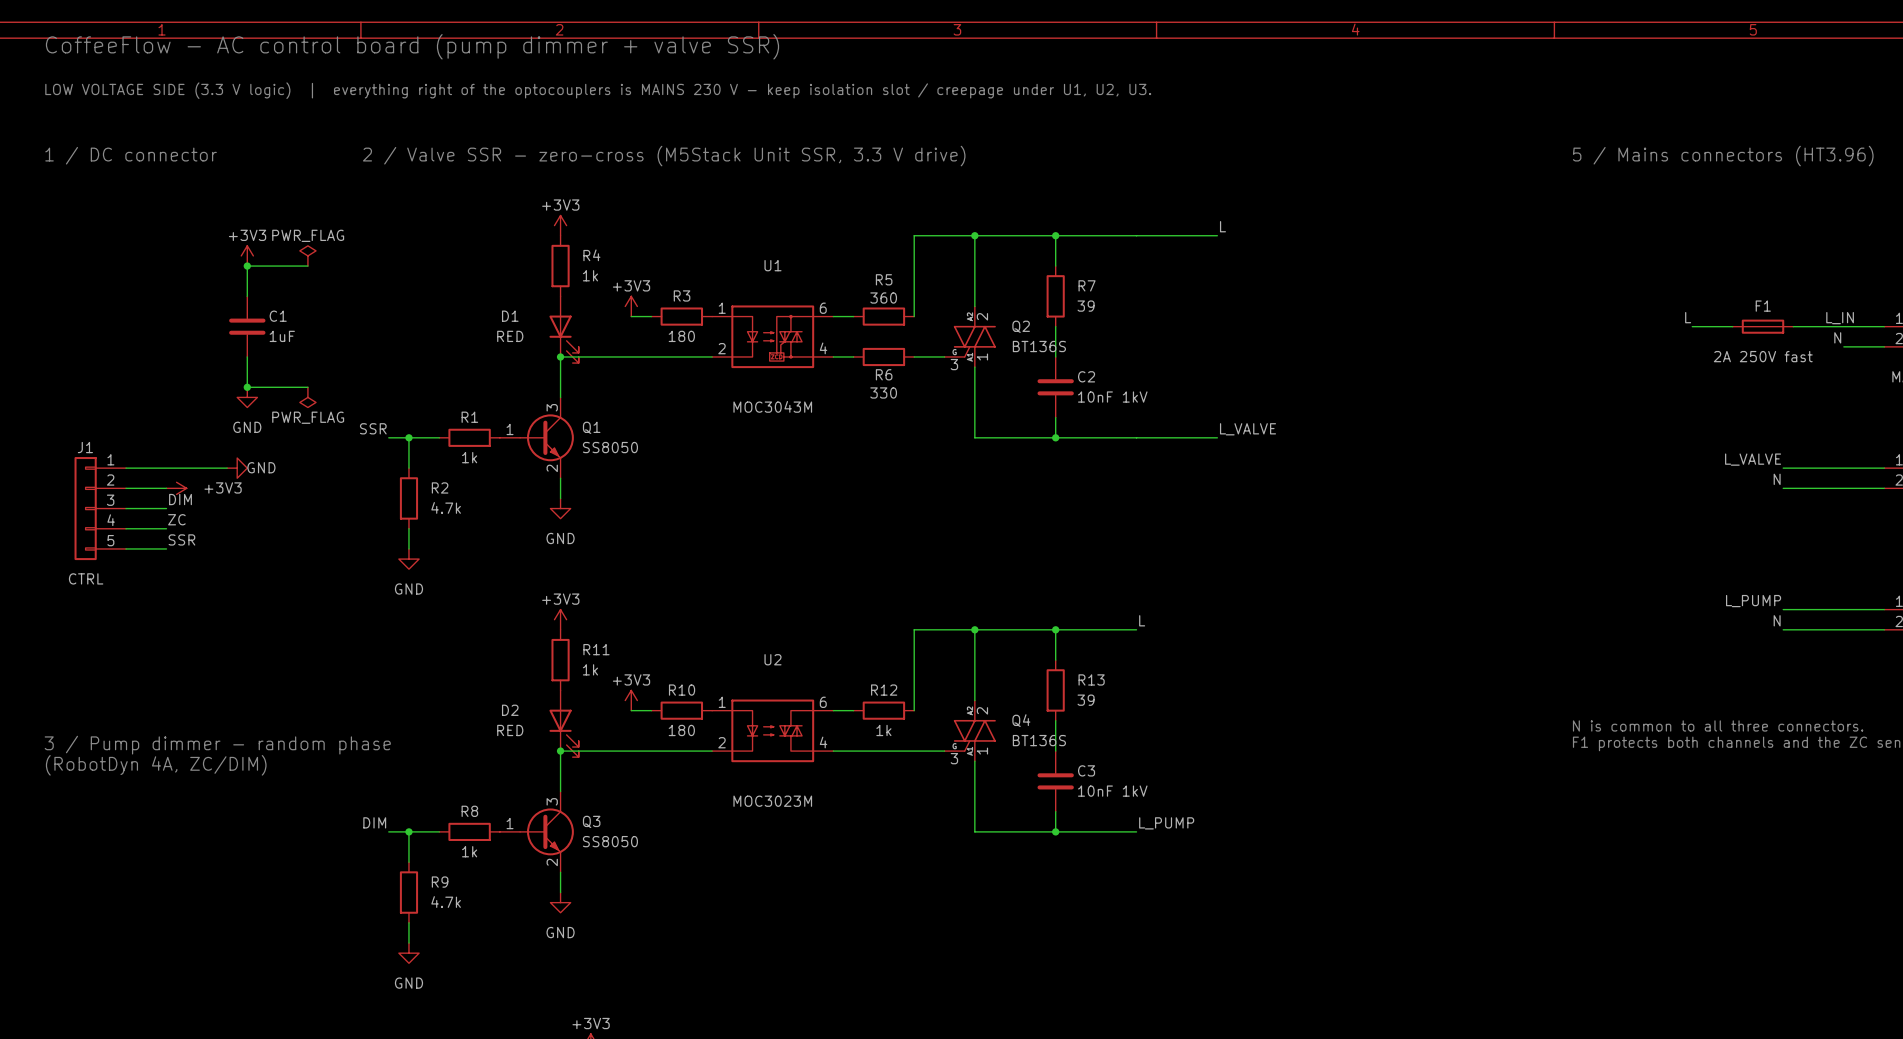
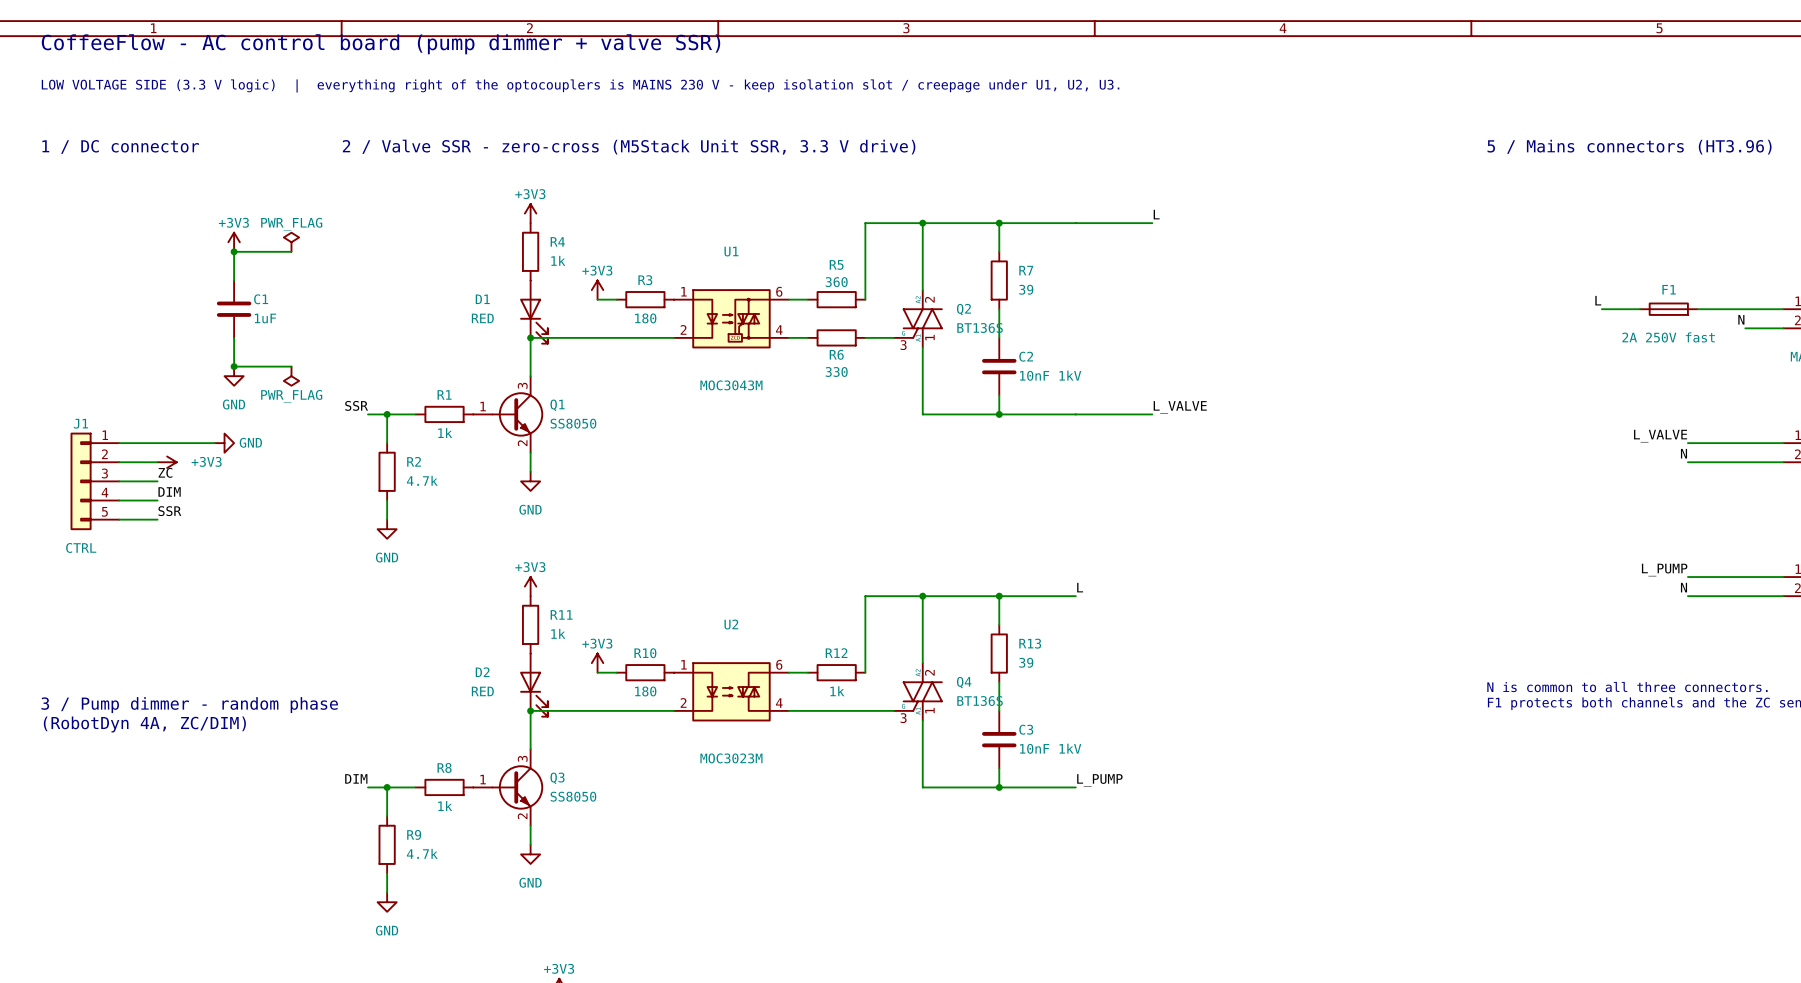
label: L_IN (1840, 318) -> none
label: DIM (180, 499) -> ZC (165, 472)
label: ZC (176, 519) -> DIM (169, 491)

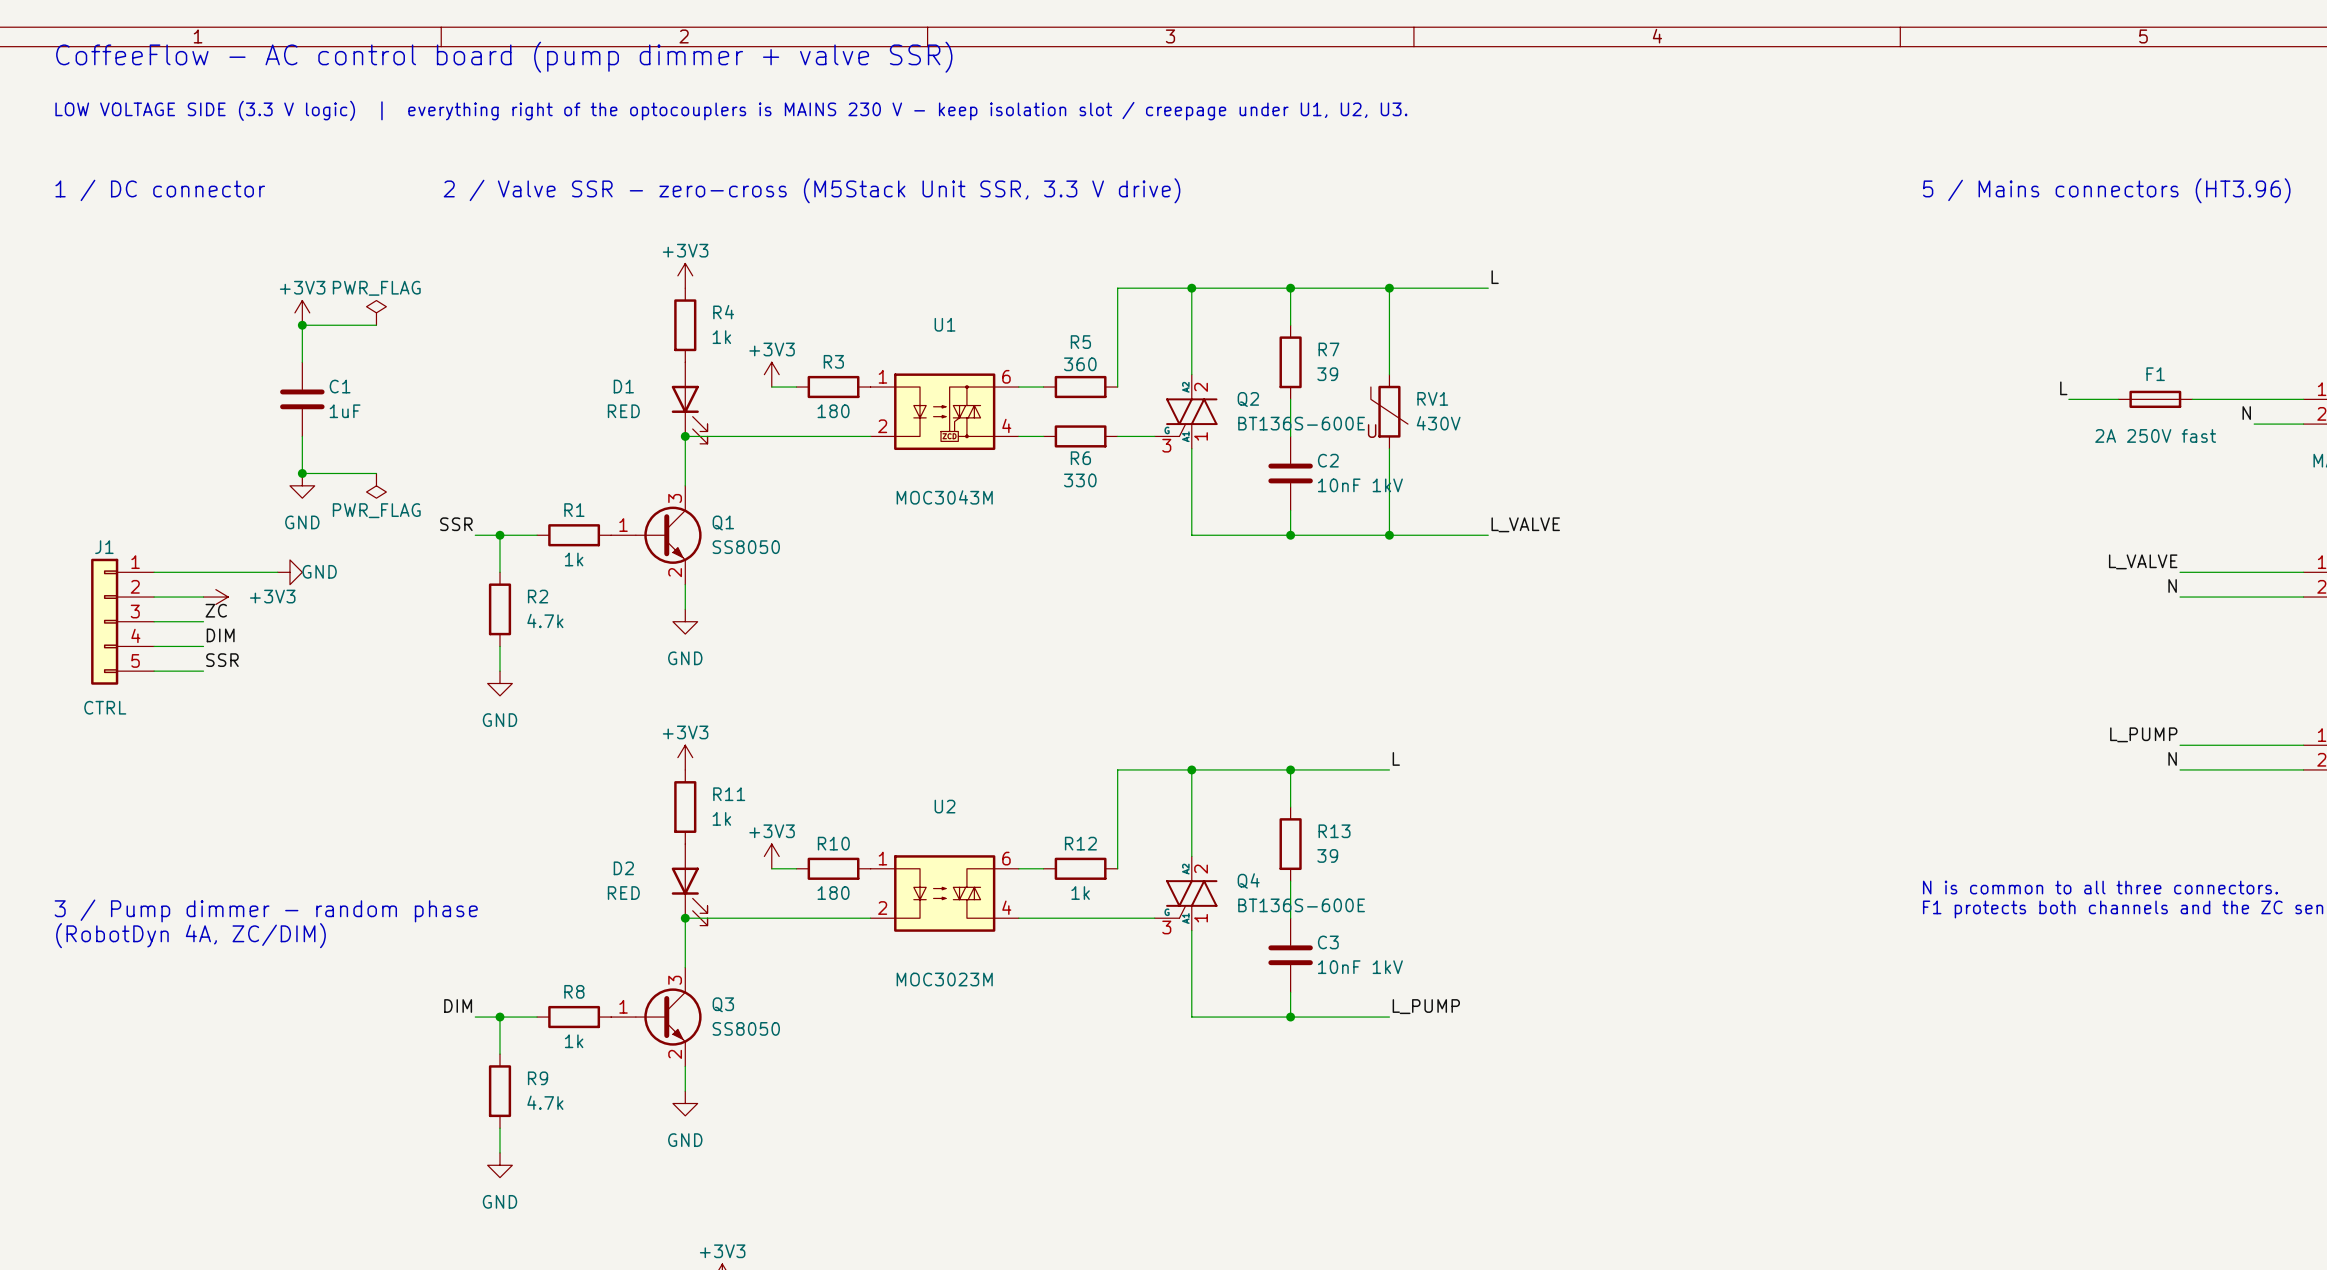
wire: none -> (1389, 288) (1389, 374)
junction: none -> (1389, 288)
RV1: none -> 430V (1389, 411)
Q2 value: BT136S (980, 327) -> BT136S-600E (1301, 423)
wire: none -> (1389, 448) (1389, 535)
junction: none -> (1389, 535)
Q4 value: BT136S (980, 701) -> BT136S-600E (1301, 905)

